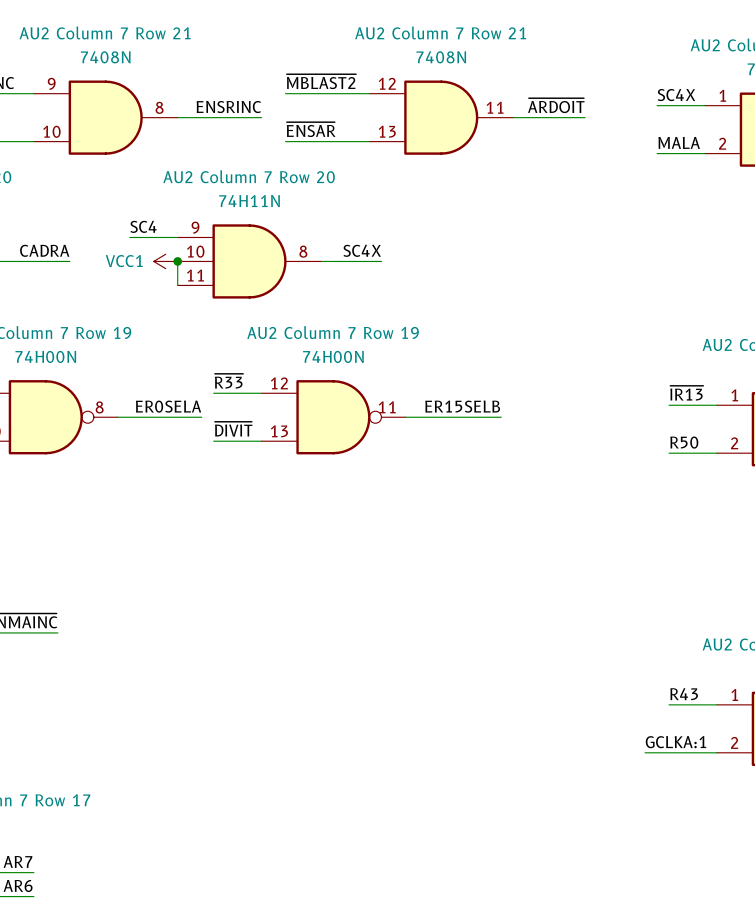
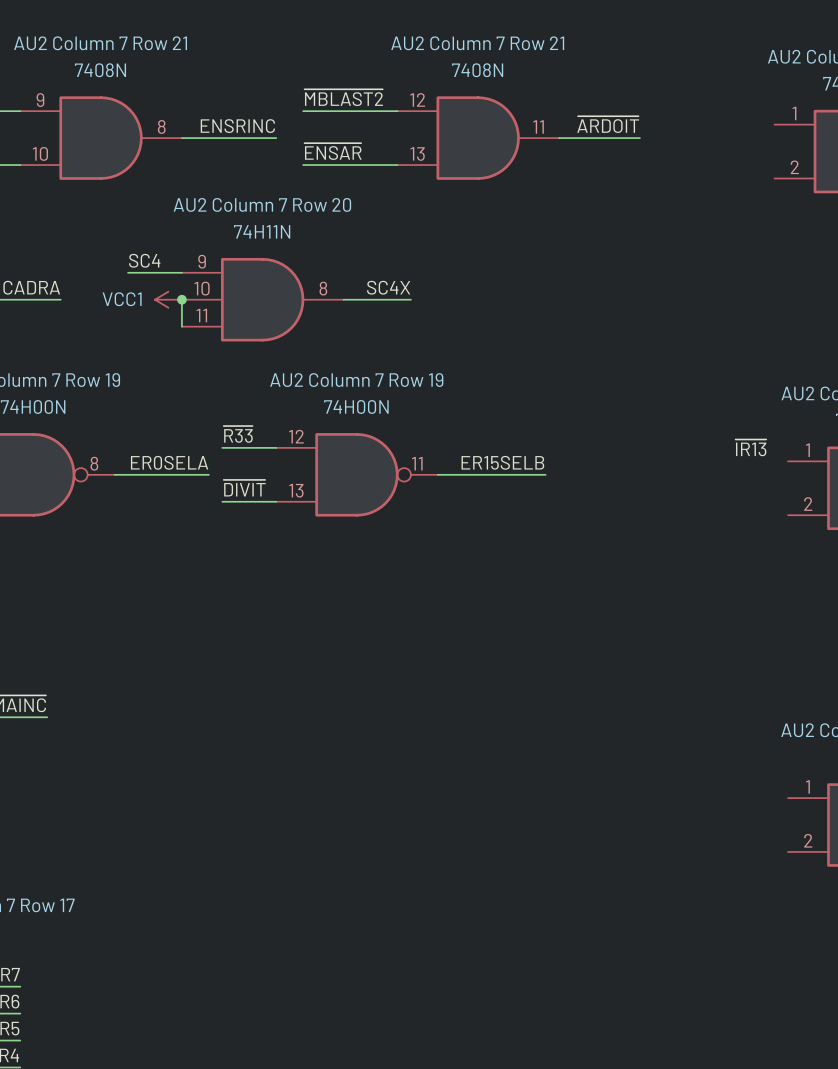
label: SC4X (676, 95) -> none
wire: (657, 105) (705, 105) -> none
label: MALA (679, 142) -> none
wire: (657, 153) (705, 153) -> none
wire: (669, 405) (716, 405) -> none
label: R50 (684, 442) -> none
wire: (669, 453) (716, 453) -> none
label: R43 (684, 694) -> none
wire: (669, 704) (716, 704) -> none
label: GCLKA:1 (675, 742) -> none
wire: (645, 752) (716, 752) -> none

